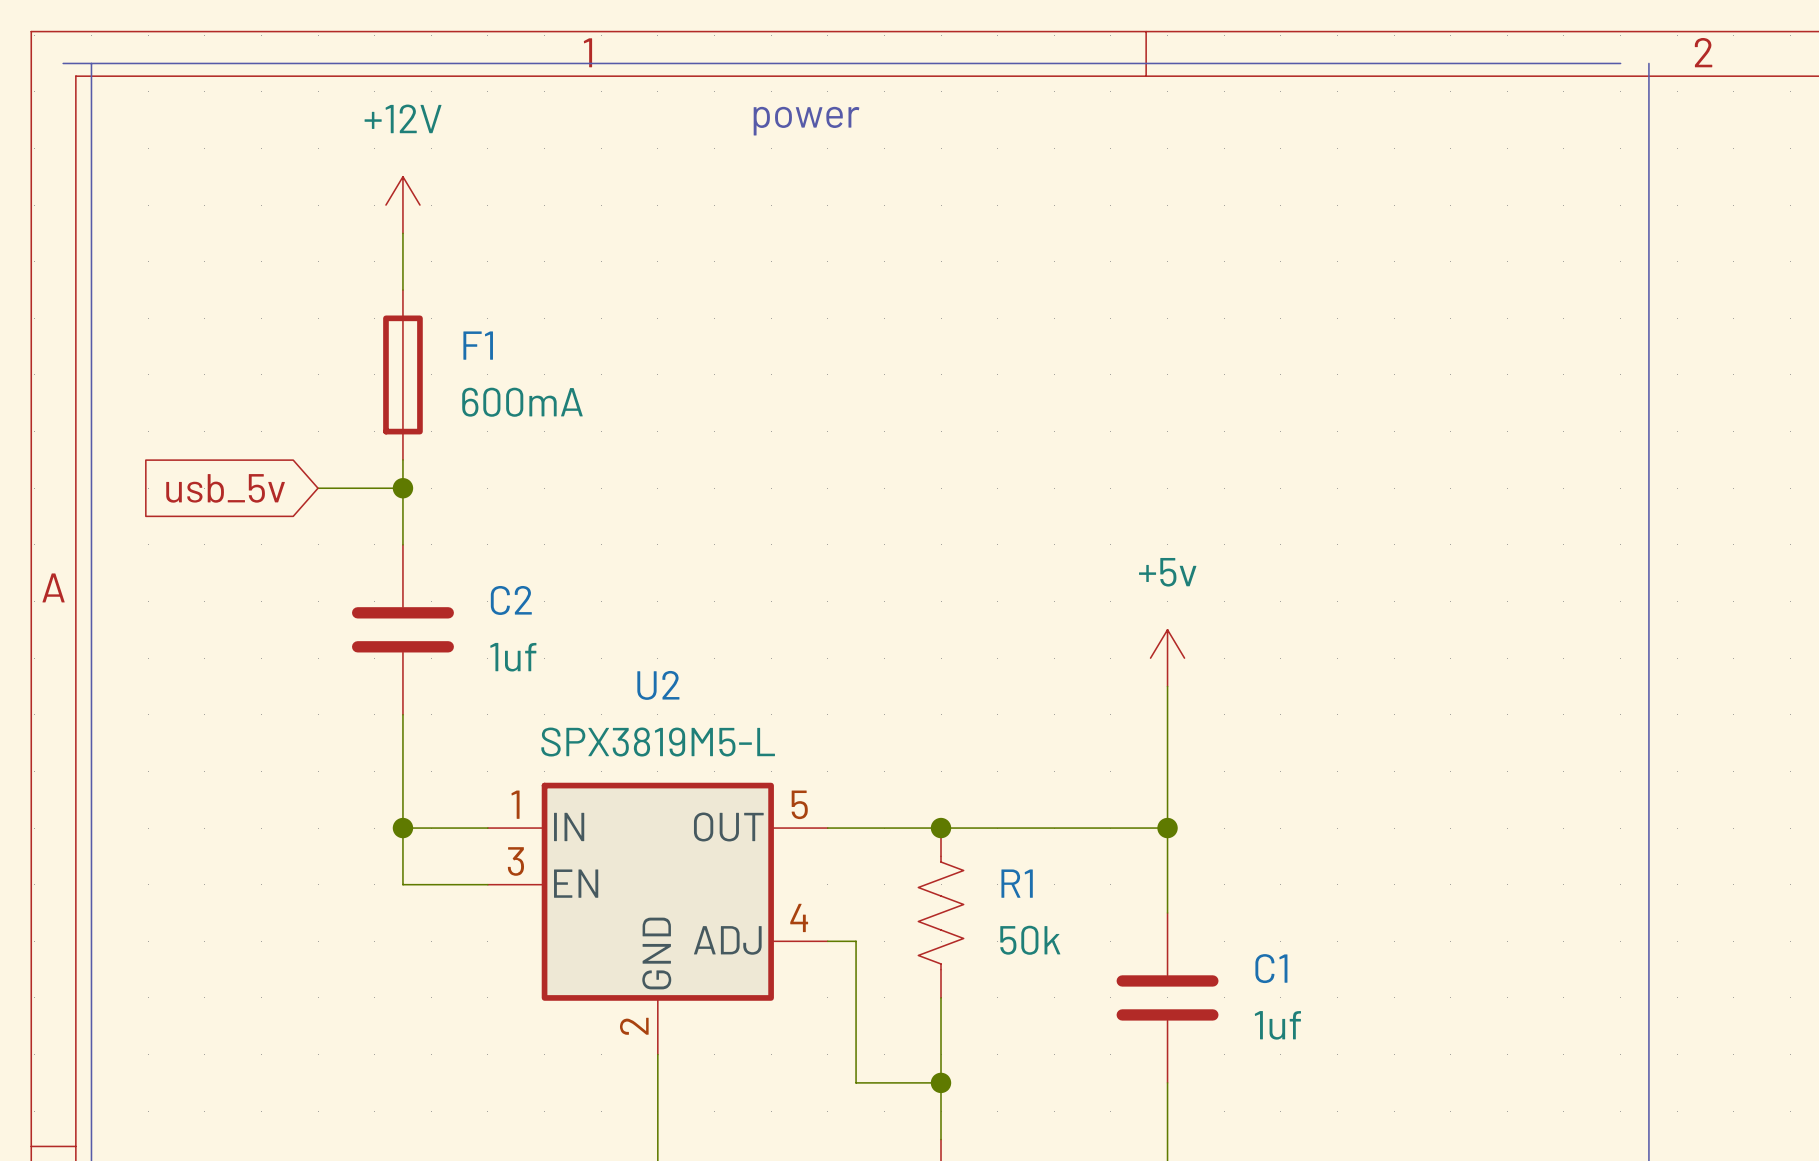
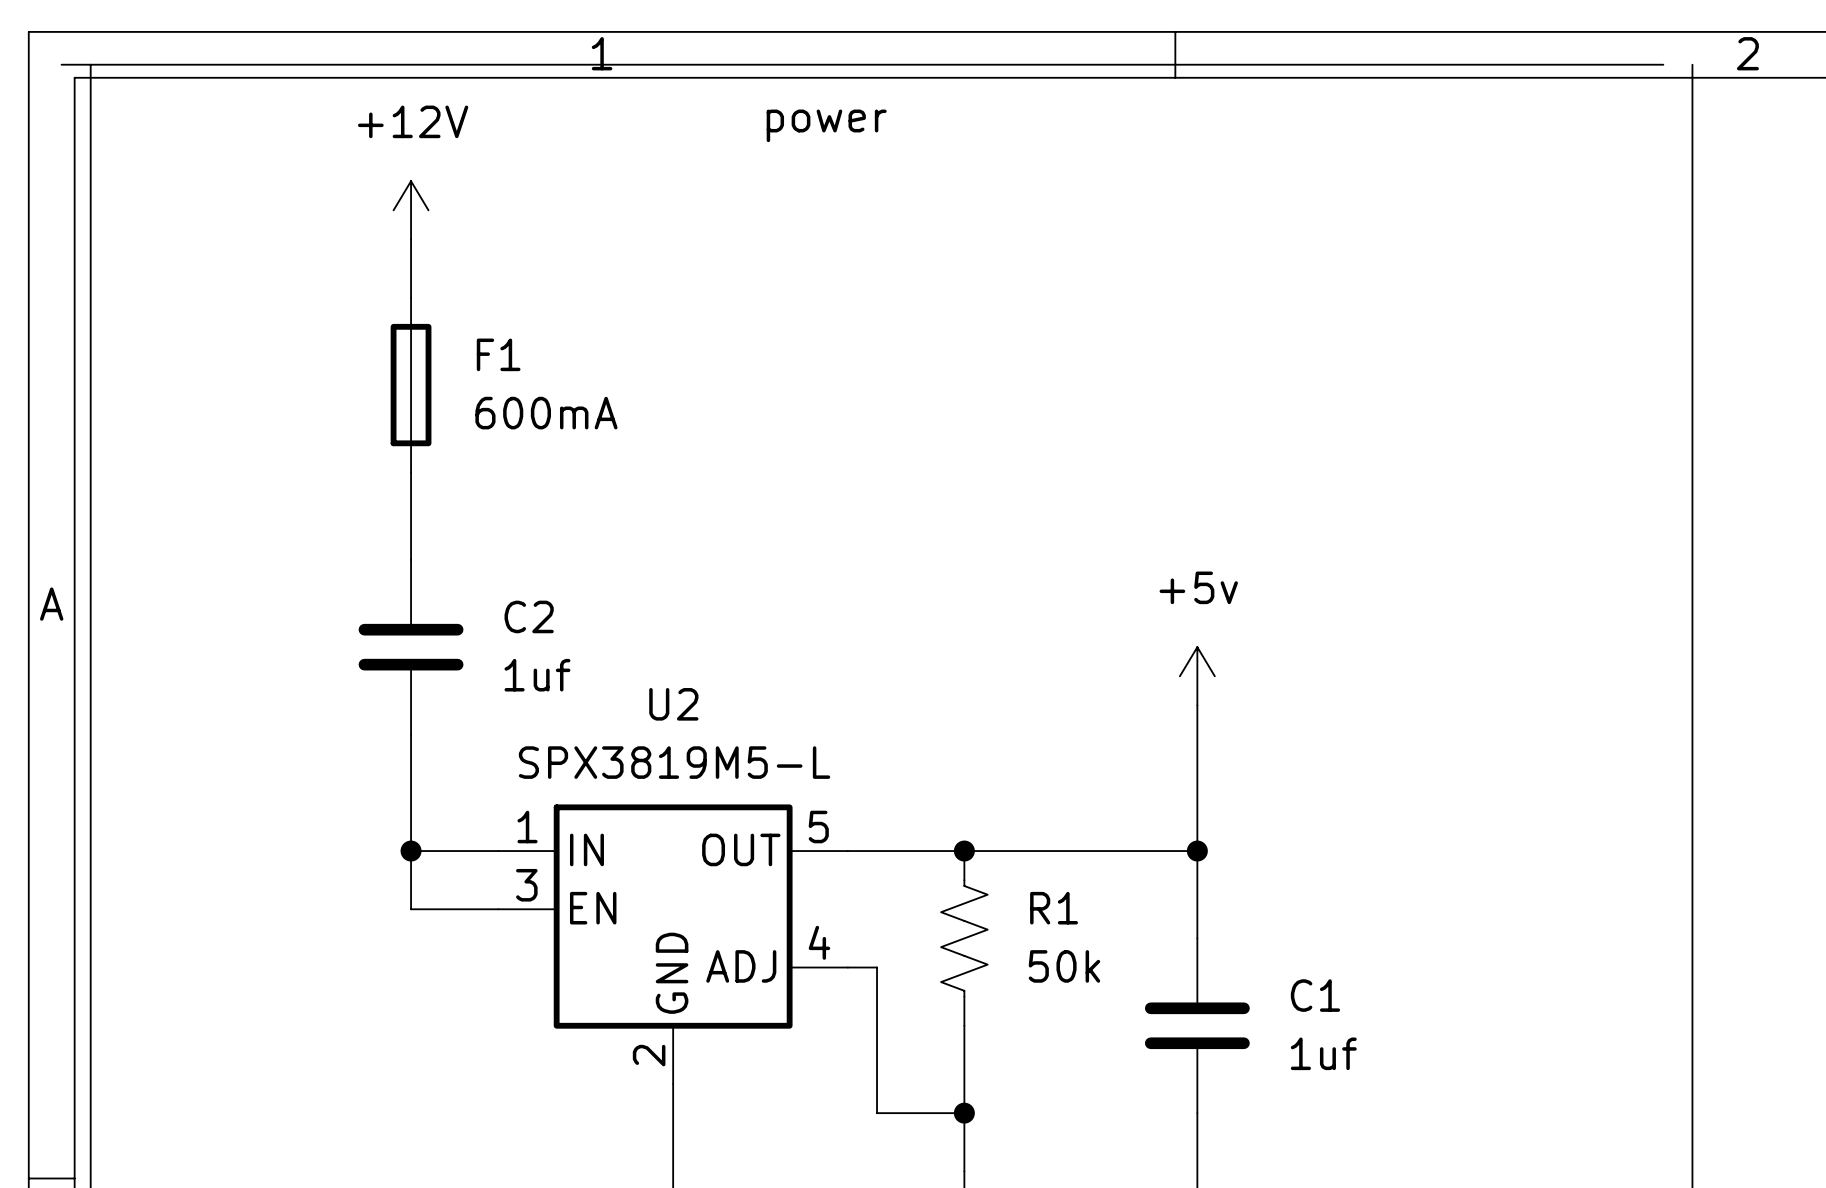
global label: usb_5v (225, 488) -> none
wire: (318, 488) (402, 488) -> none
junction: (402, 488) -> none

